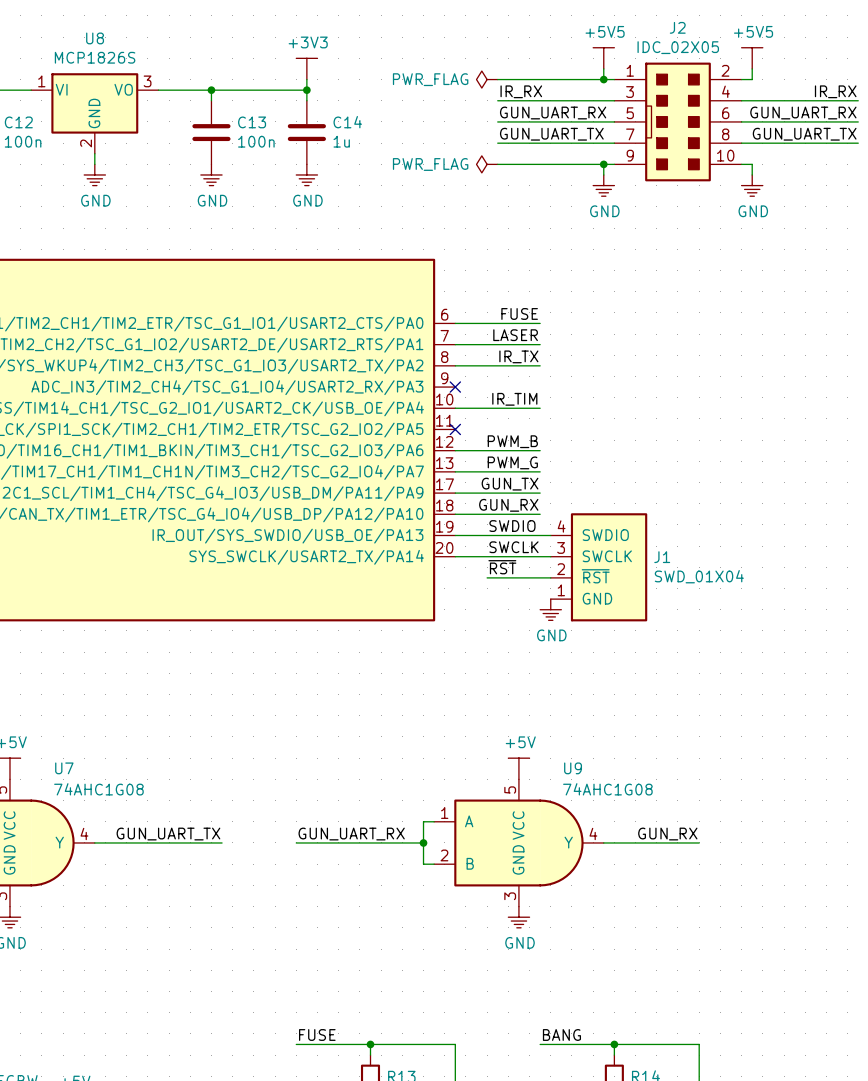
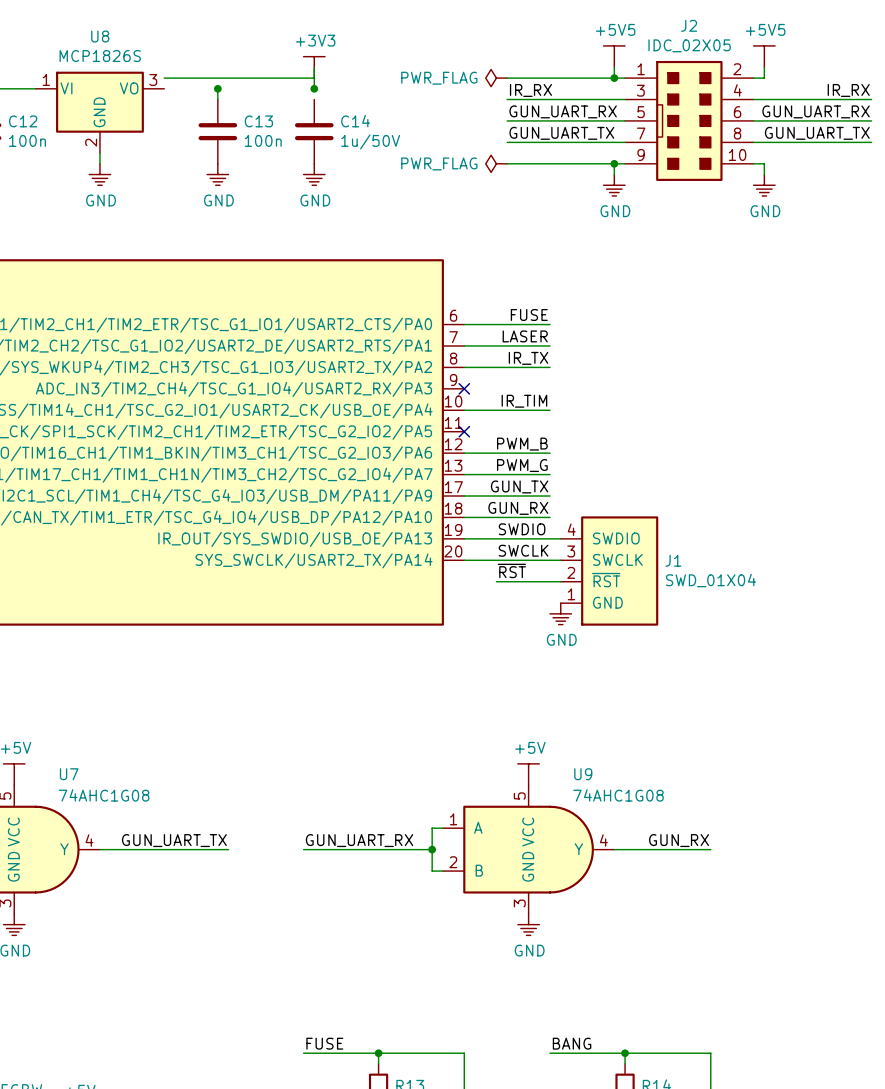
wire: none -> (314, 67) (314, 78) (164, 78)
wire: (158, 90) (306, 90) (306, 100) -> none
C14 value: 1u (341, 141) -> 1u/50V (370, 141)

